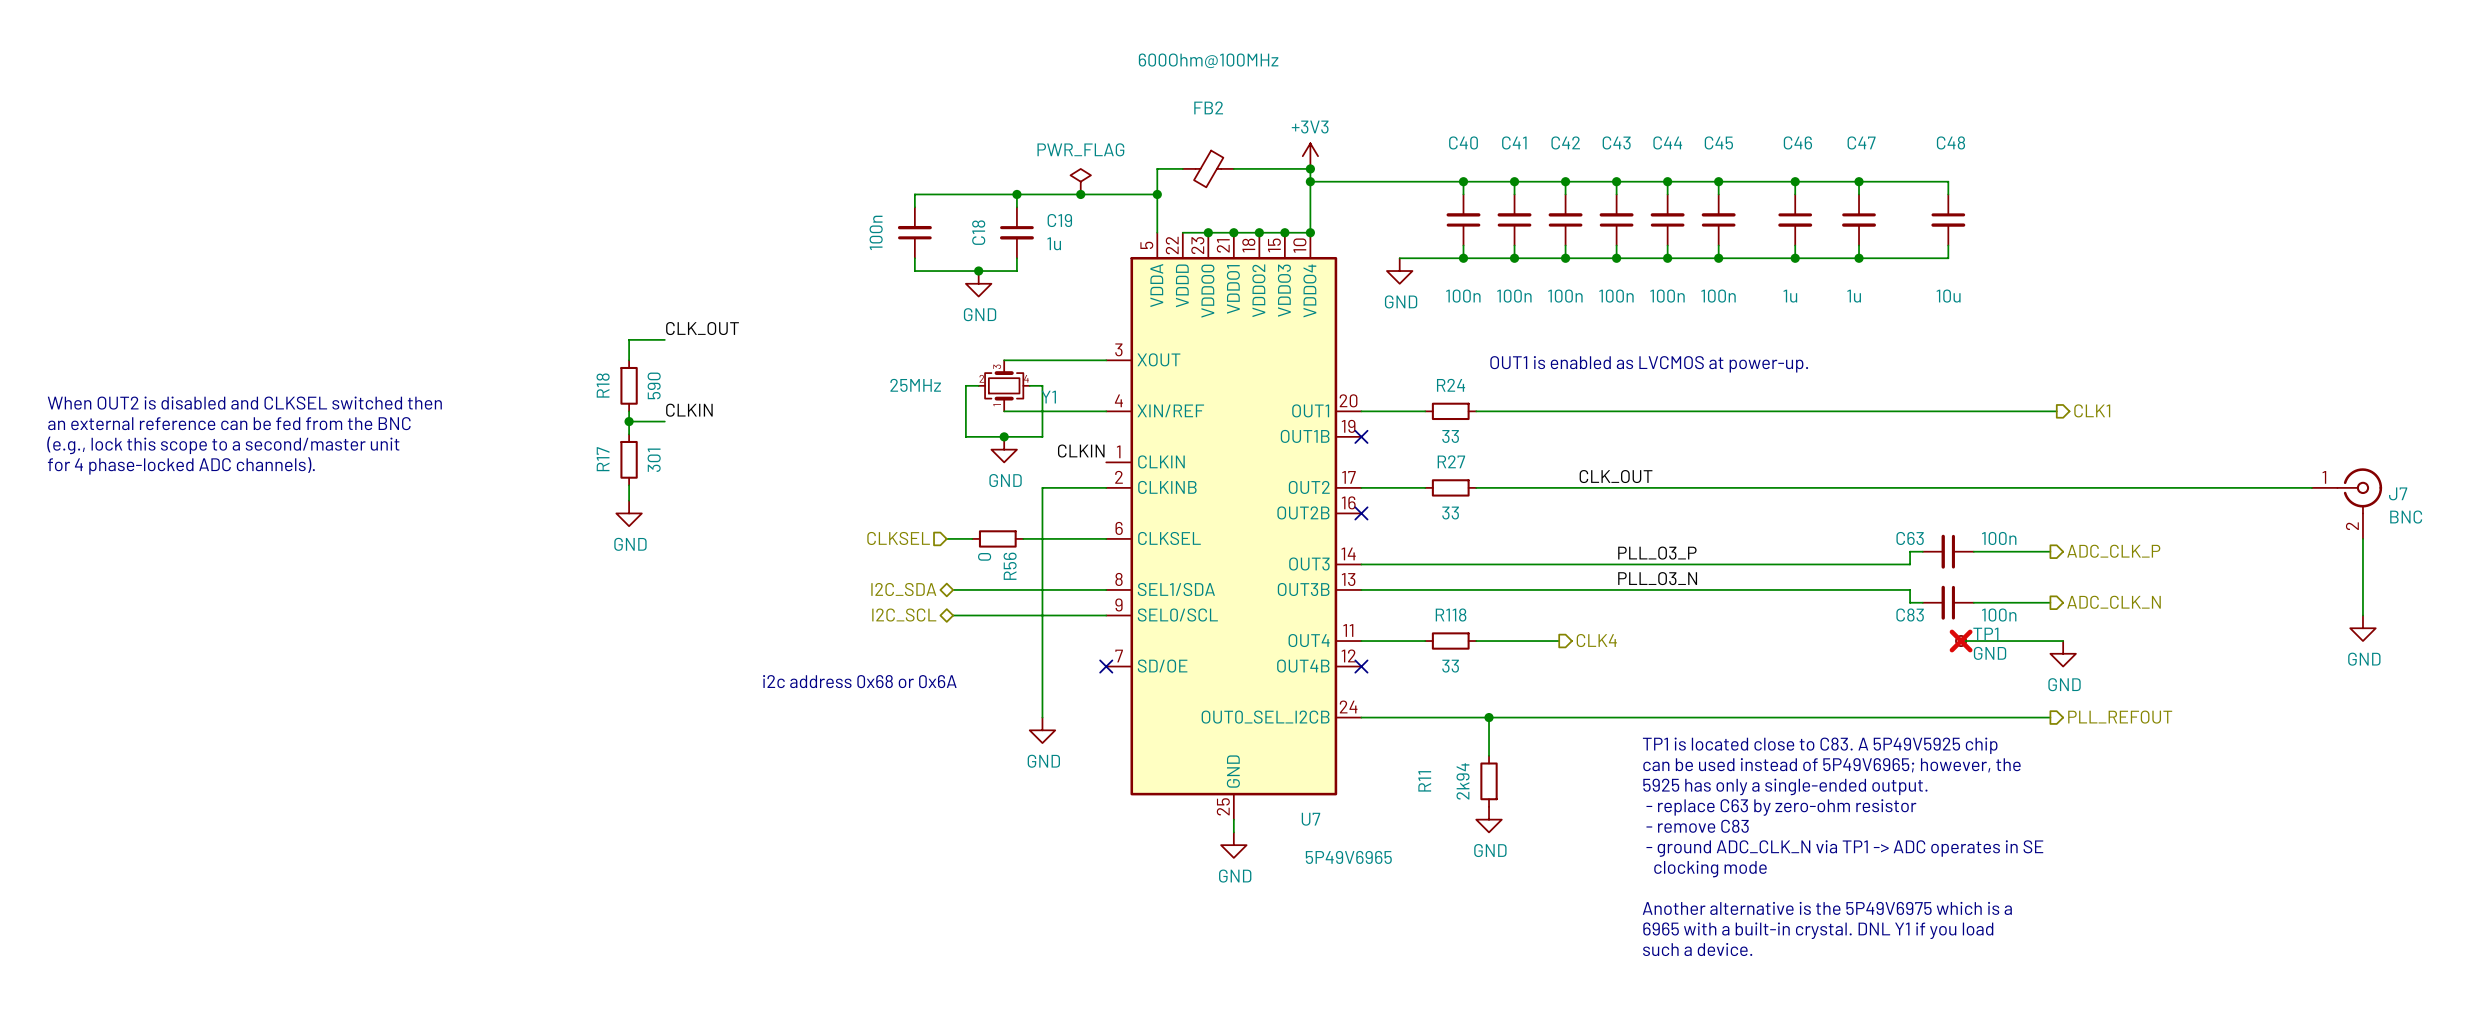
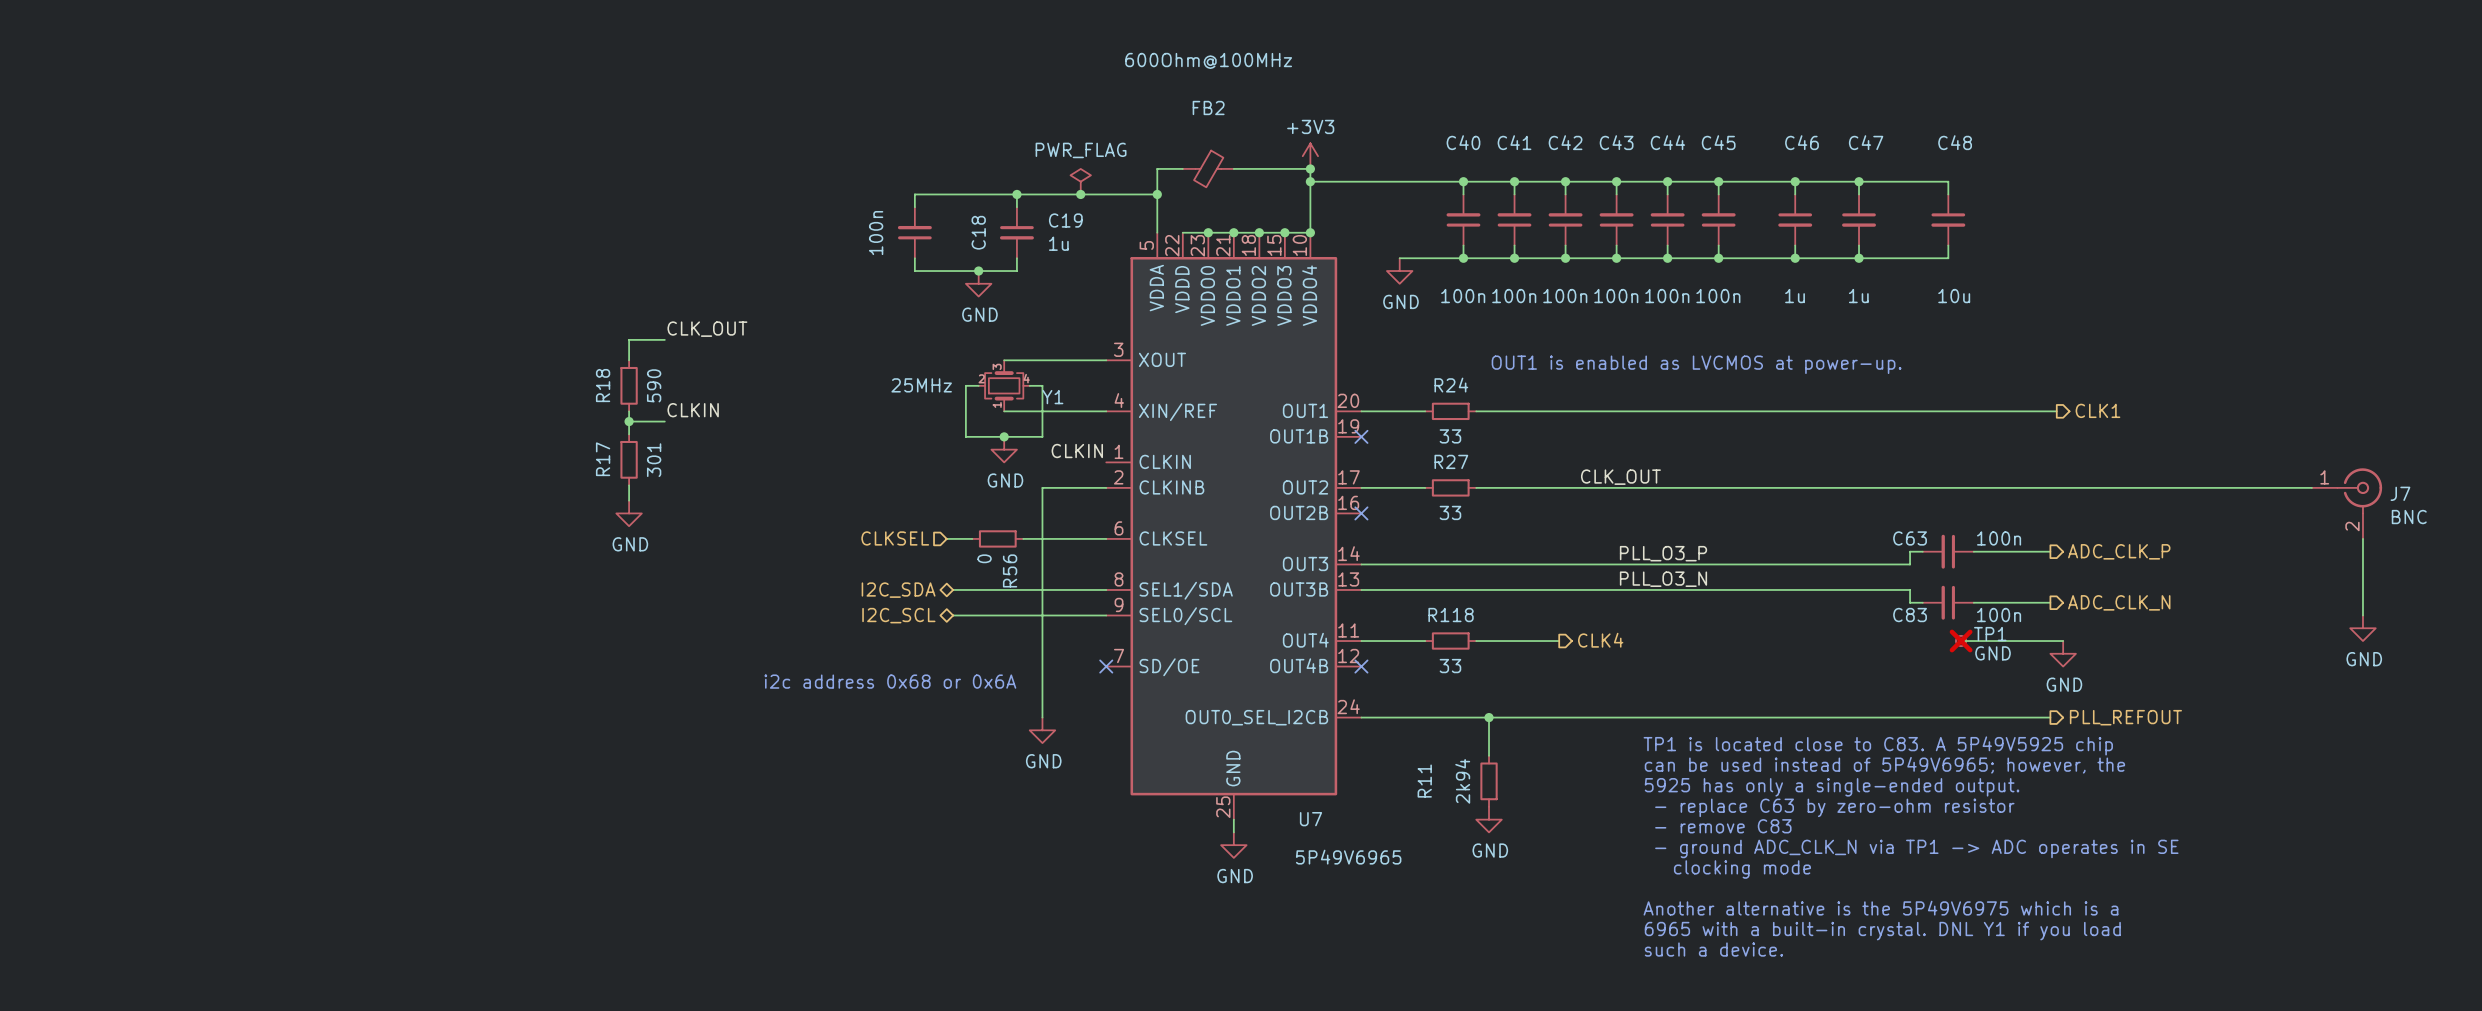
text: When OUT2 is disabled and CLKSEL switched then (244, 403) -> none
text: an external reference can be fed from the BNC (229, 423) -> none
text: (e.g., lock this scope to a second/master unit (223, 445) -> none
text: for 4 phase-locked ADC channels). (181, 465) -> none

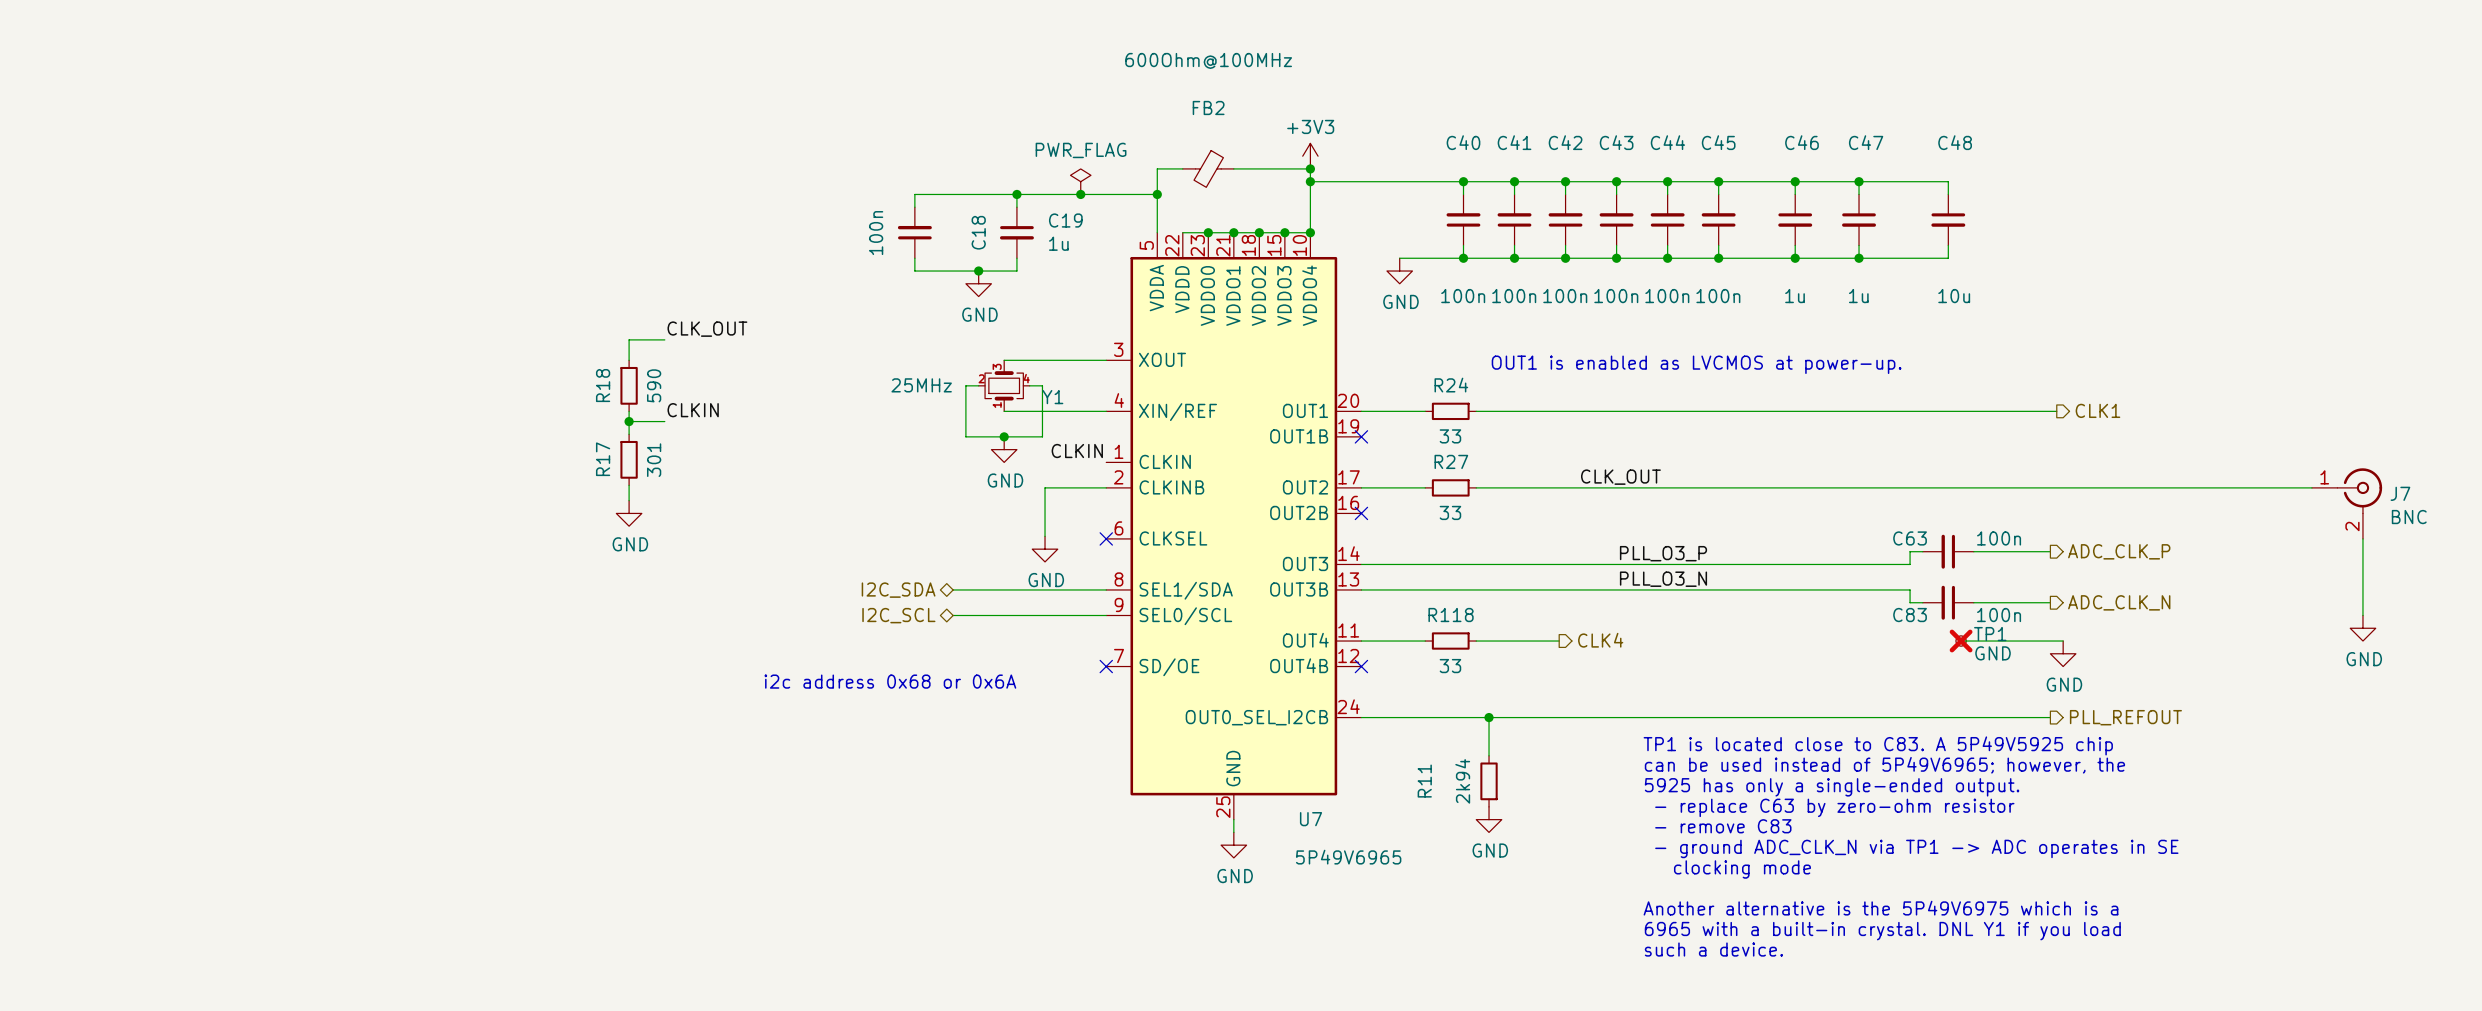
wire: (1045, 487) (1042, 487) (1042, 717) -> (1045, 487) (1045, 536)
hierarchical label: CLKSEL (895, 538) -> none
wire: (946, 538) (972, 538) -> none
R56: 0 (997, 538) -> none
wire: (1023, 538) (1106, 538) -> none
no-connect mark: none -> (1106, 538)
power symbol position: GND (1042, 730) -> GND (1045, 549)

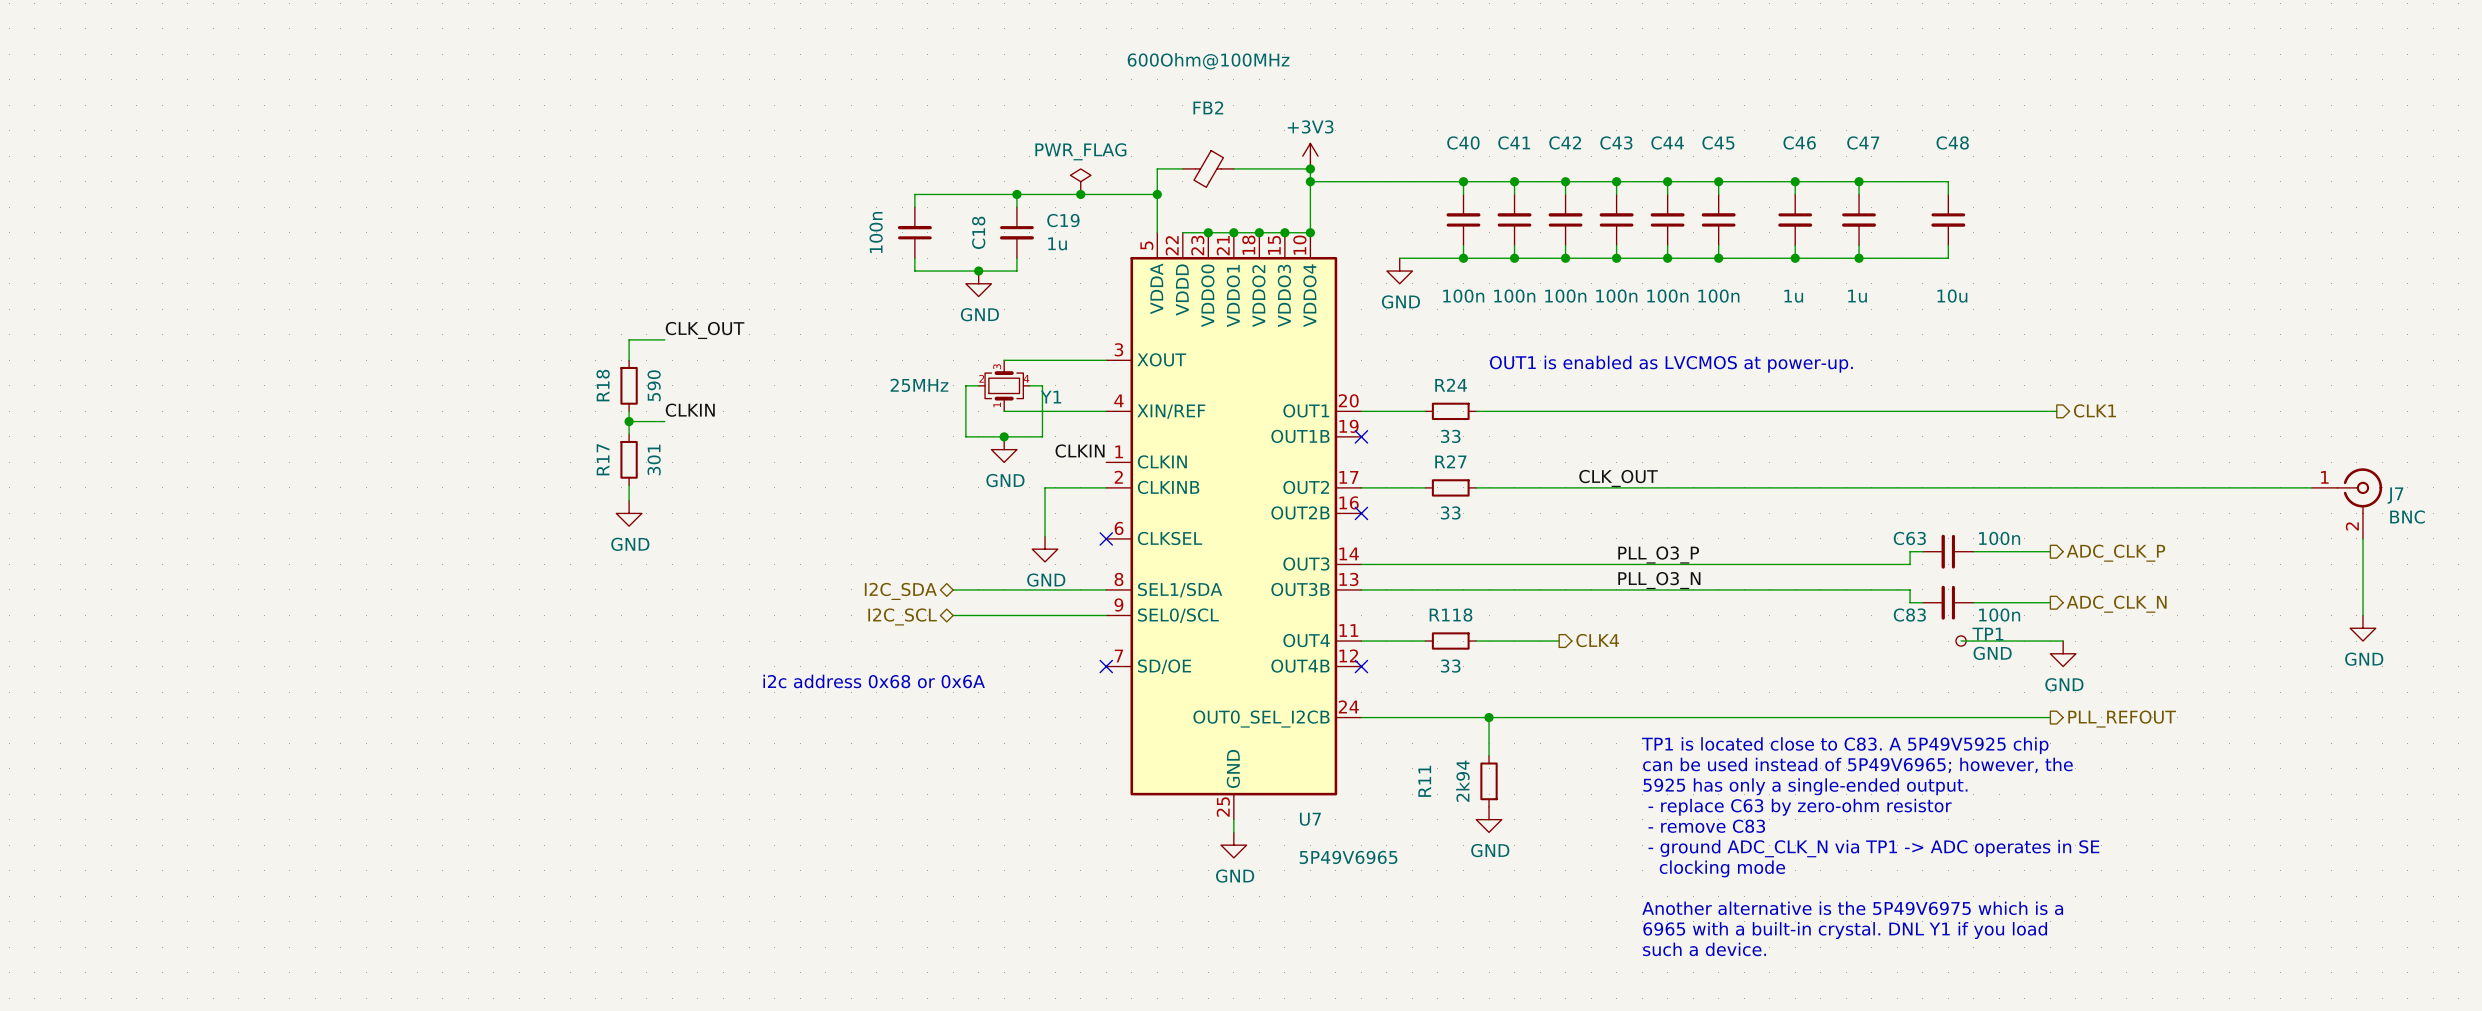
TP1 do-not-place cross: (1961, 641) -> none

